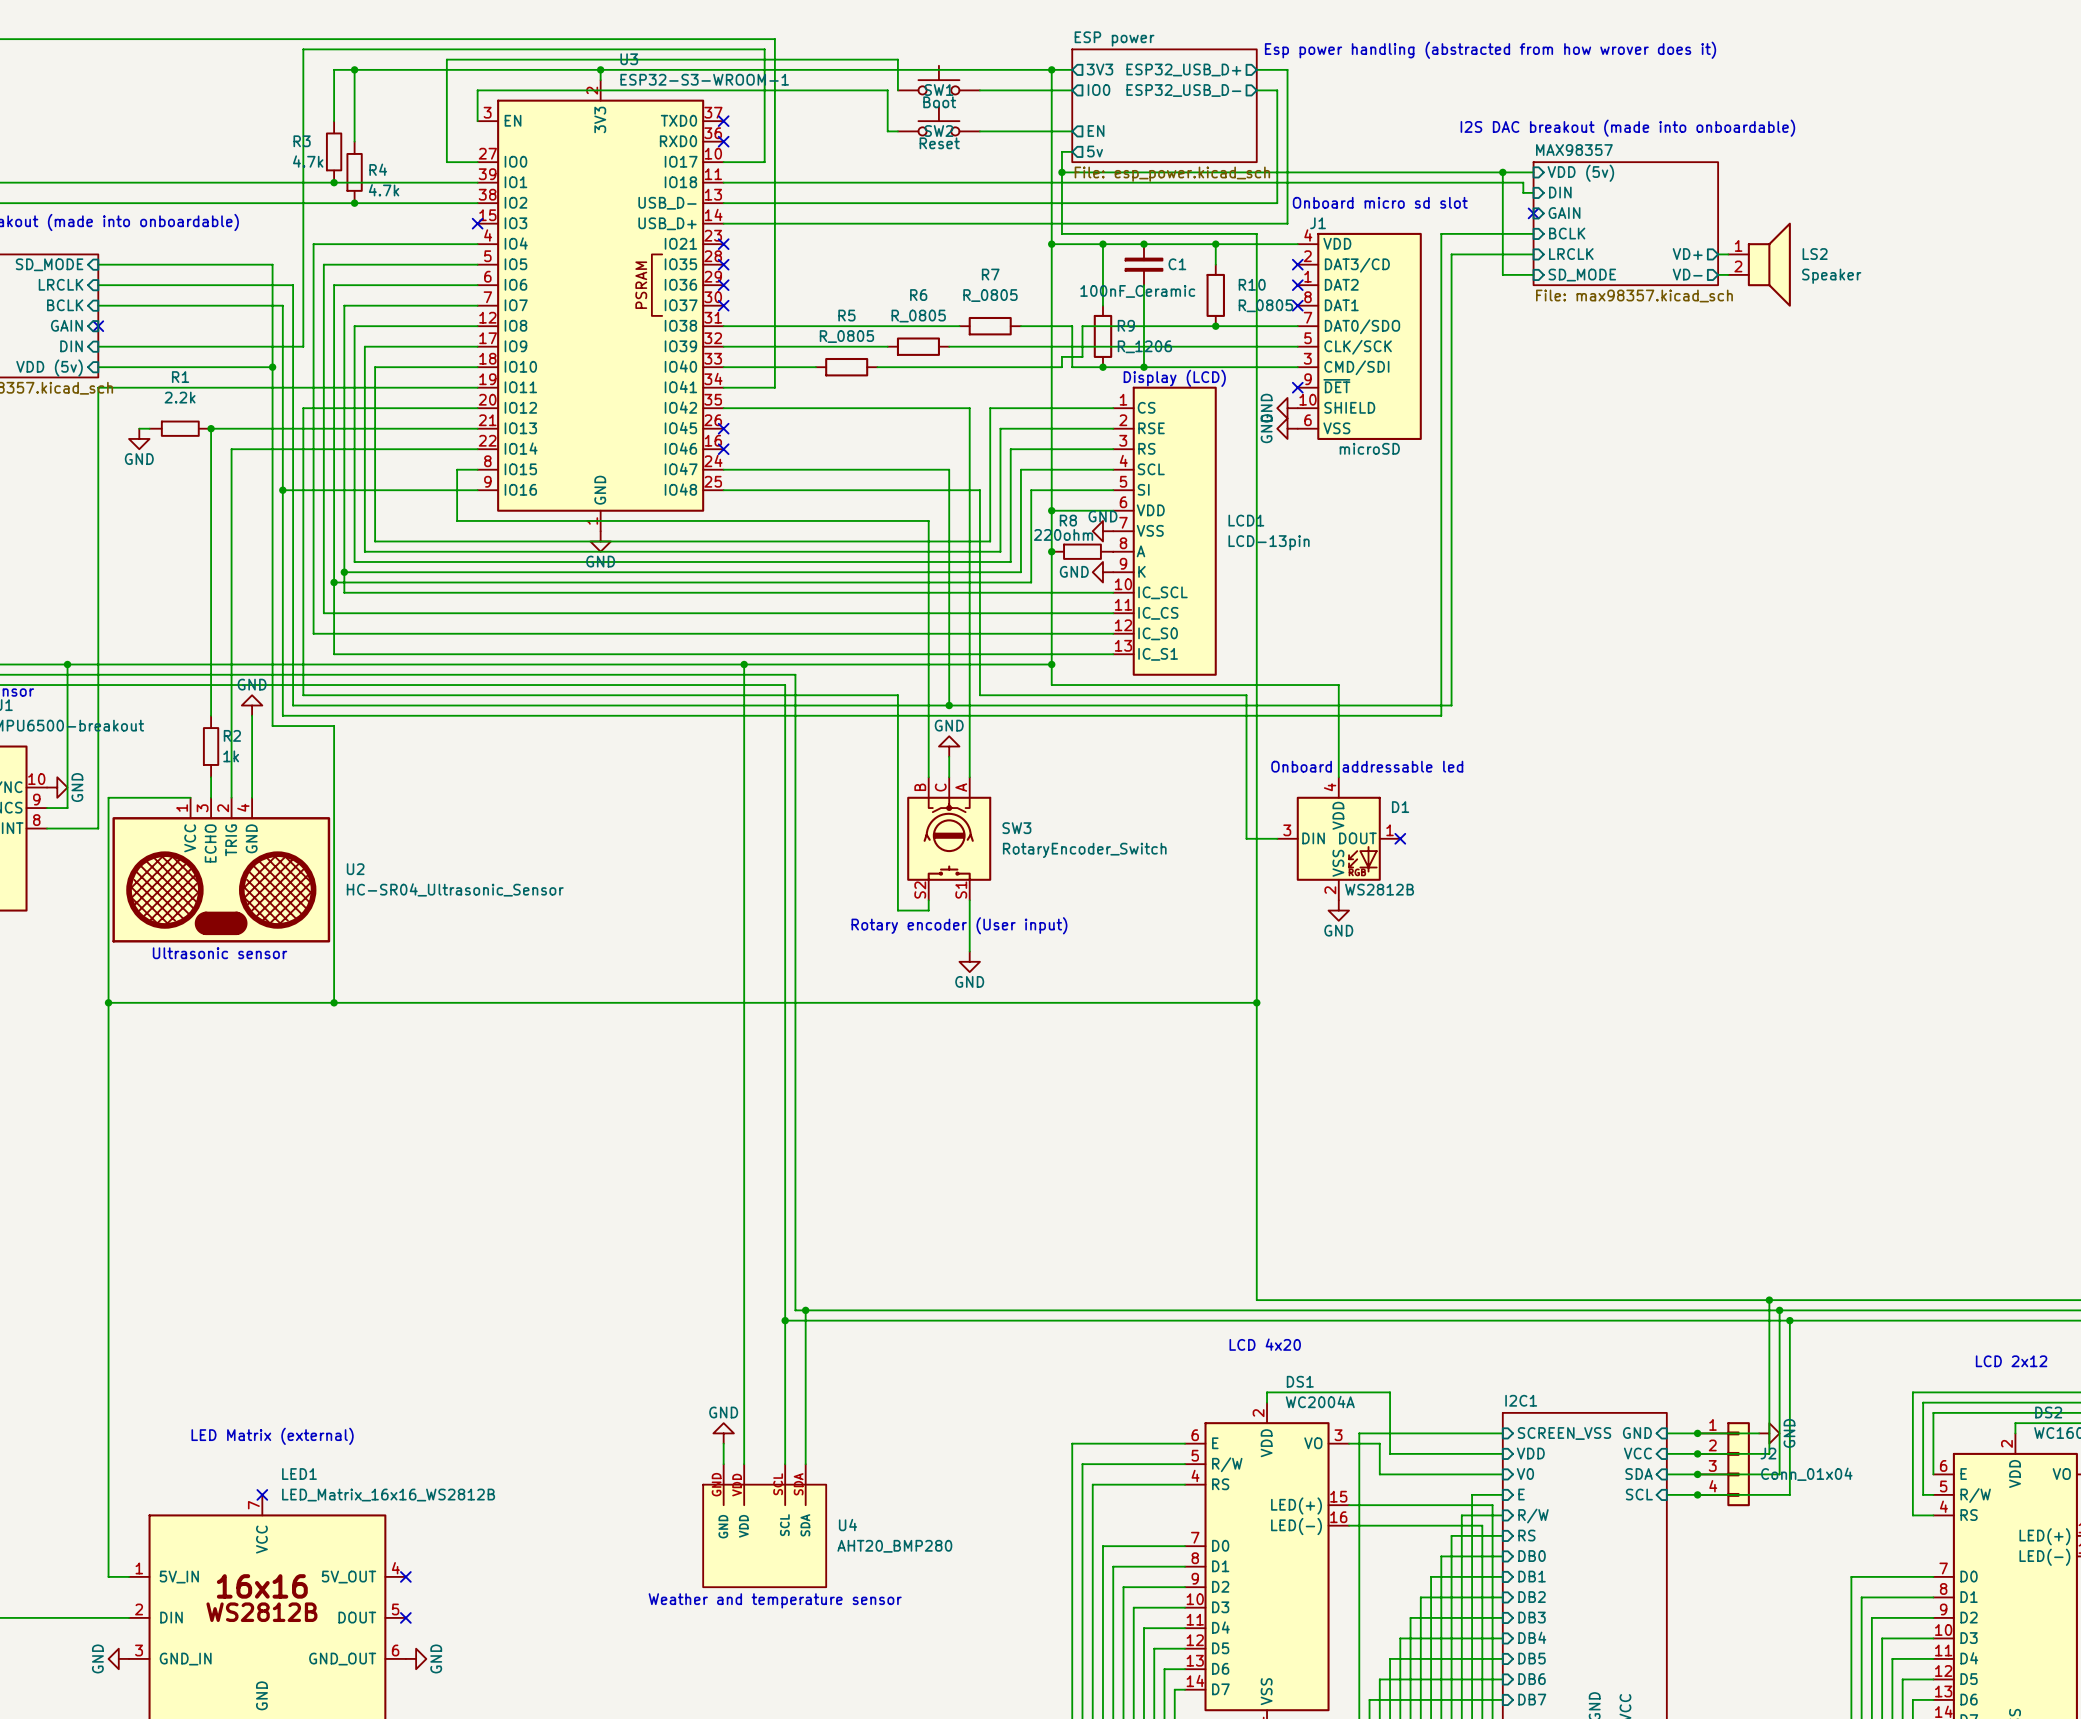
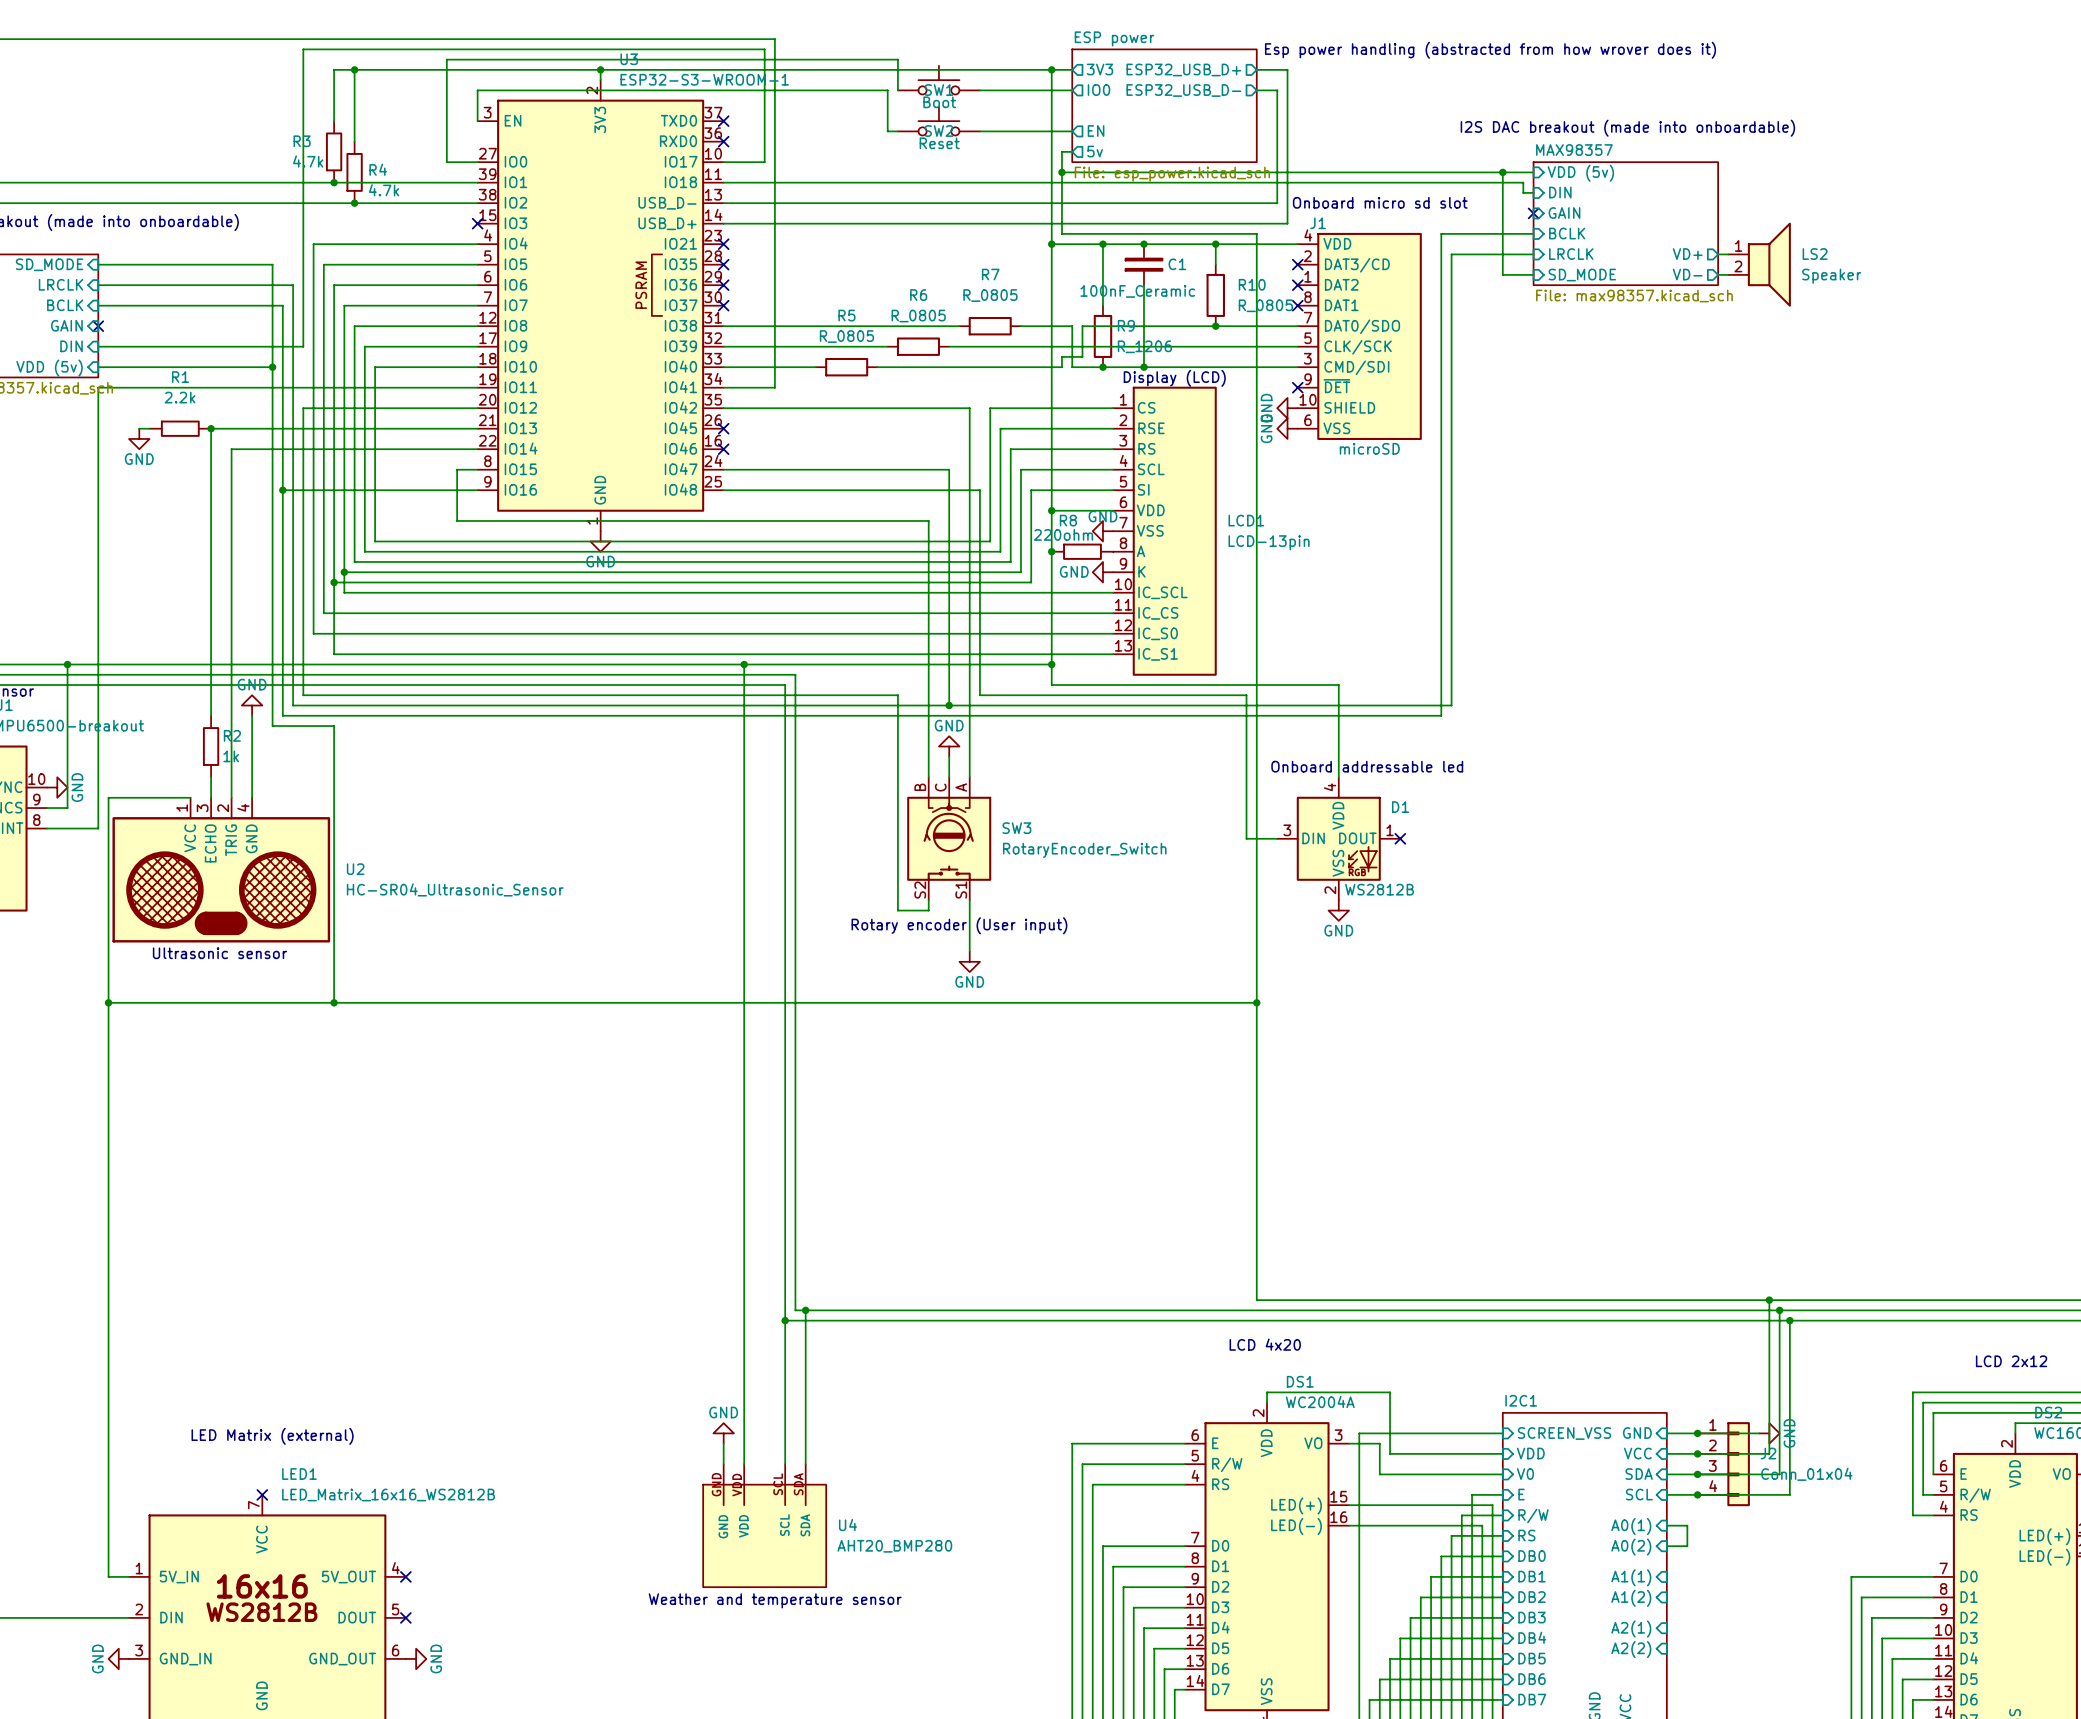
wire: none -> (1666, 1525) (1687, 1525) (1687, 1546) (1666, 1546)
sheet pin: none -> A0(1) (1631, 1526)
sheet pin: none -> A0(2) (1631, 1547)
sheet pin: none -> A1(1) (1631, 1577)
sheet pin: none -> A1(2) (1631, 1598)
sheet pin: none -> A2(1) (1631, 1629)
sheet pin: none -> A2(2) (1631, 1649)

